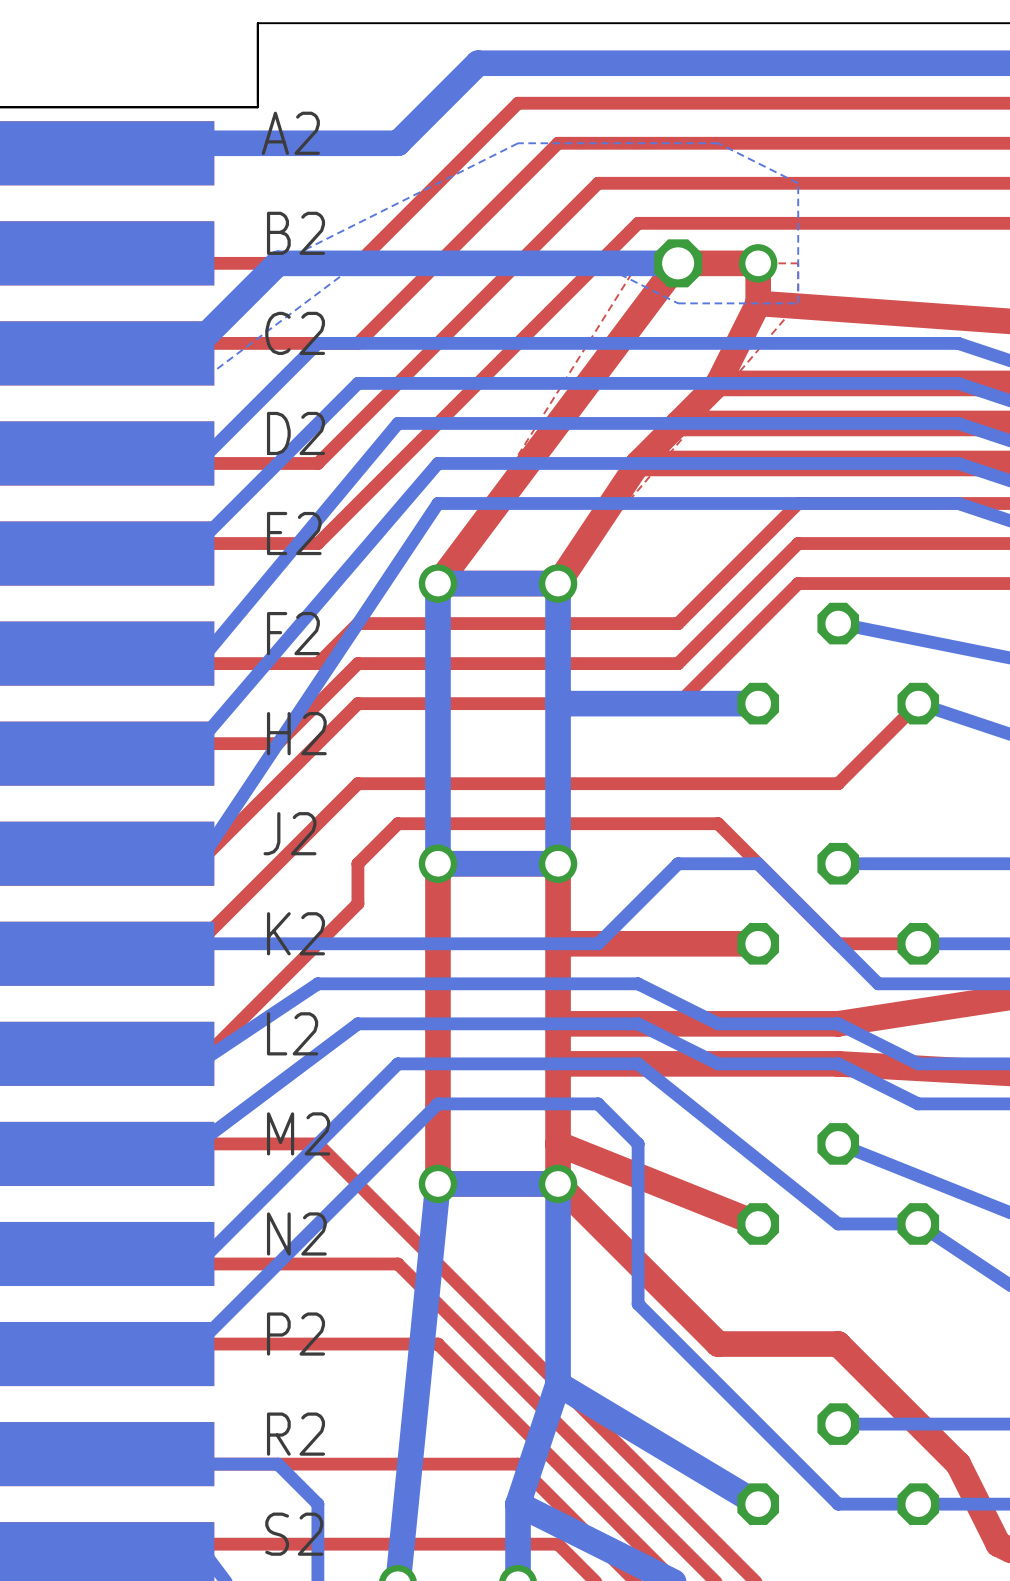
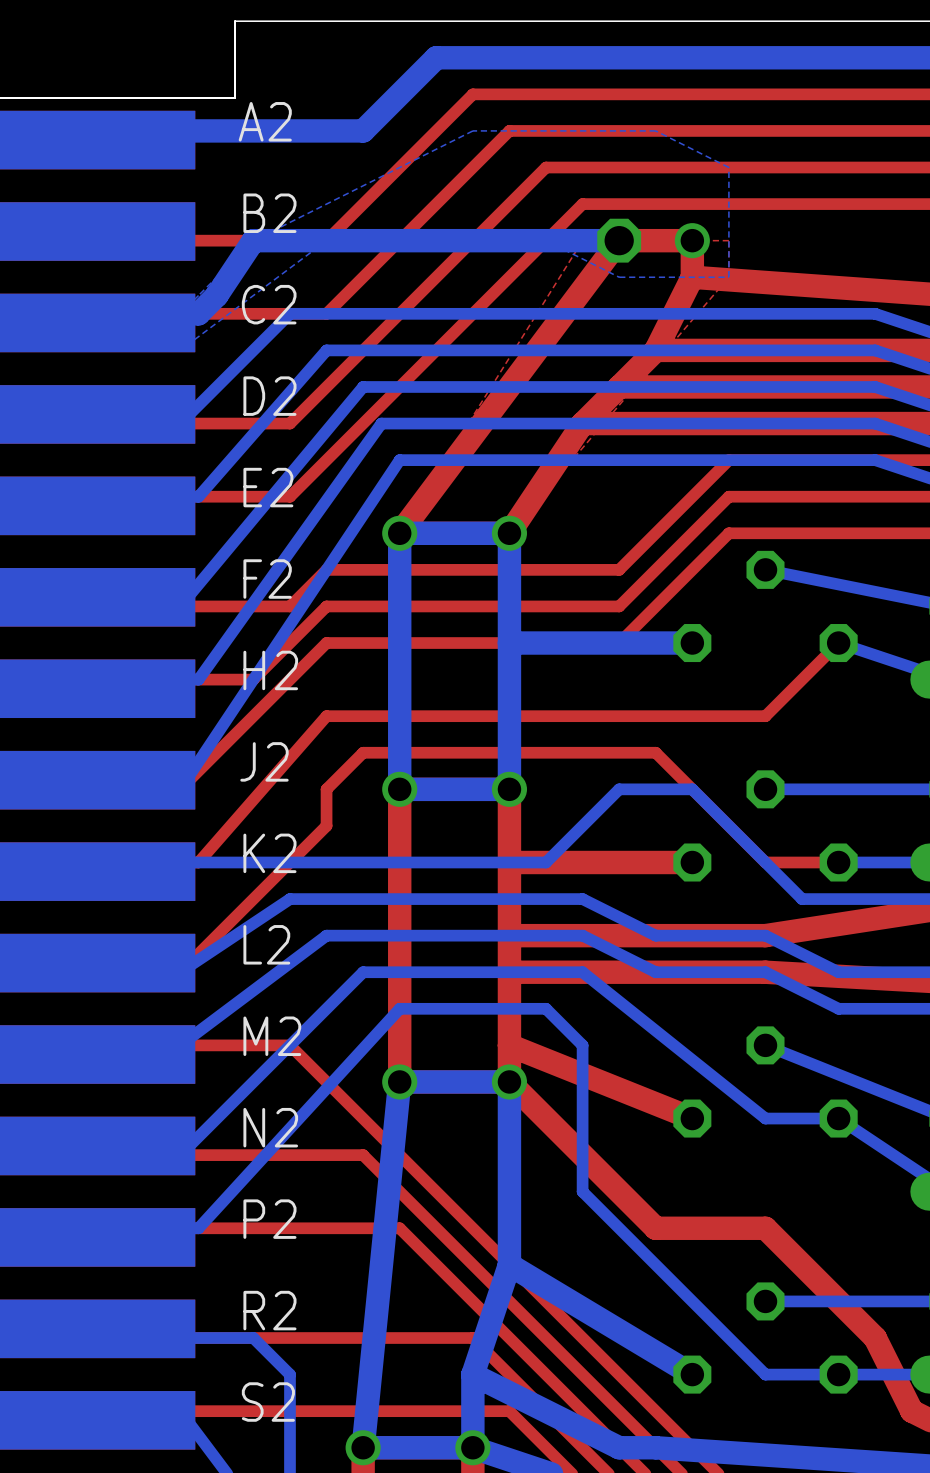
bottom track: (277, 263) (197, 343) -> (253, 240) (216, 295) (198, 313) (180, 313)
bottom track: (357, 383) (197, 543) -> (326, 350) (198, 496) (180, 496)
bottom track: (437, 463) (197, 743) -> (399, 423) (381, 423) (198, 679) (180, 679)
top track: (357, 783) (197, 943) -> (326, 716) (198, 862) (180, 862)
bottom track: (437, 1103) (197, 1344) -> (399, 1008) (198, 1228) (180, 1228)

